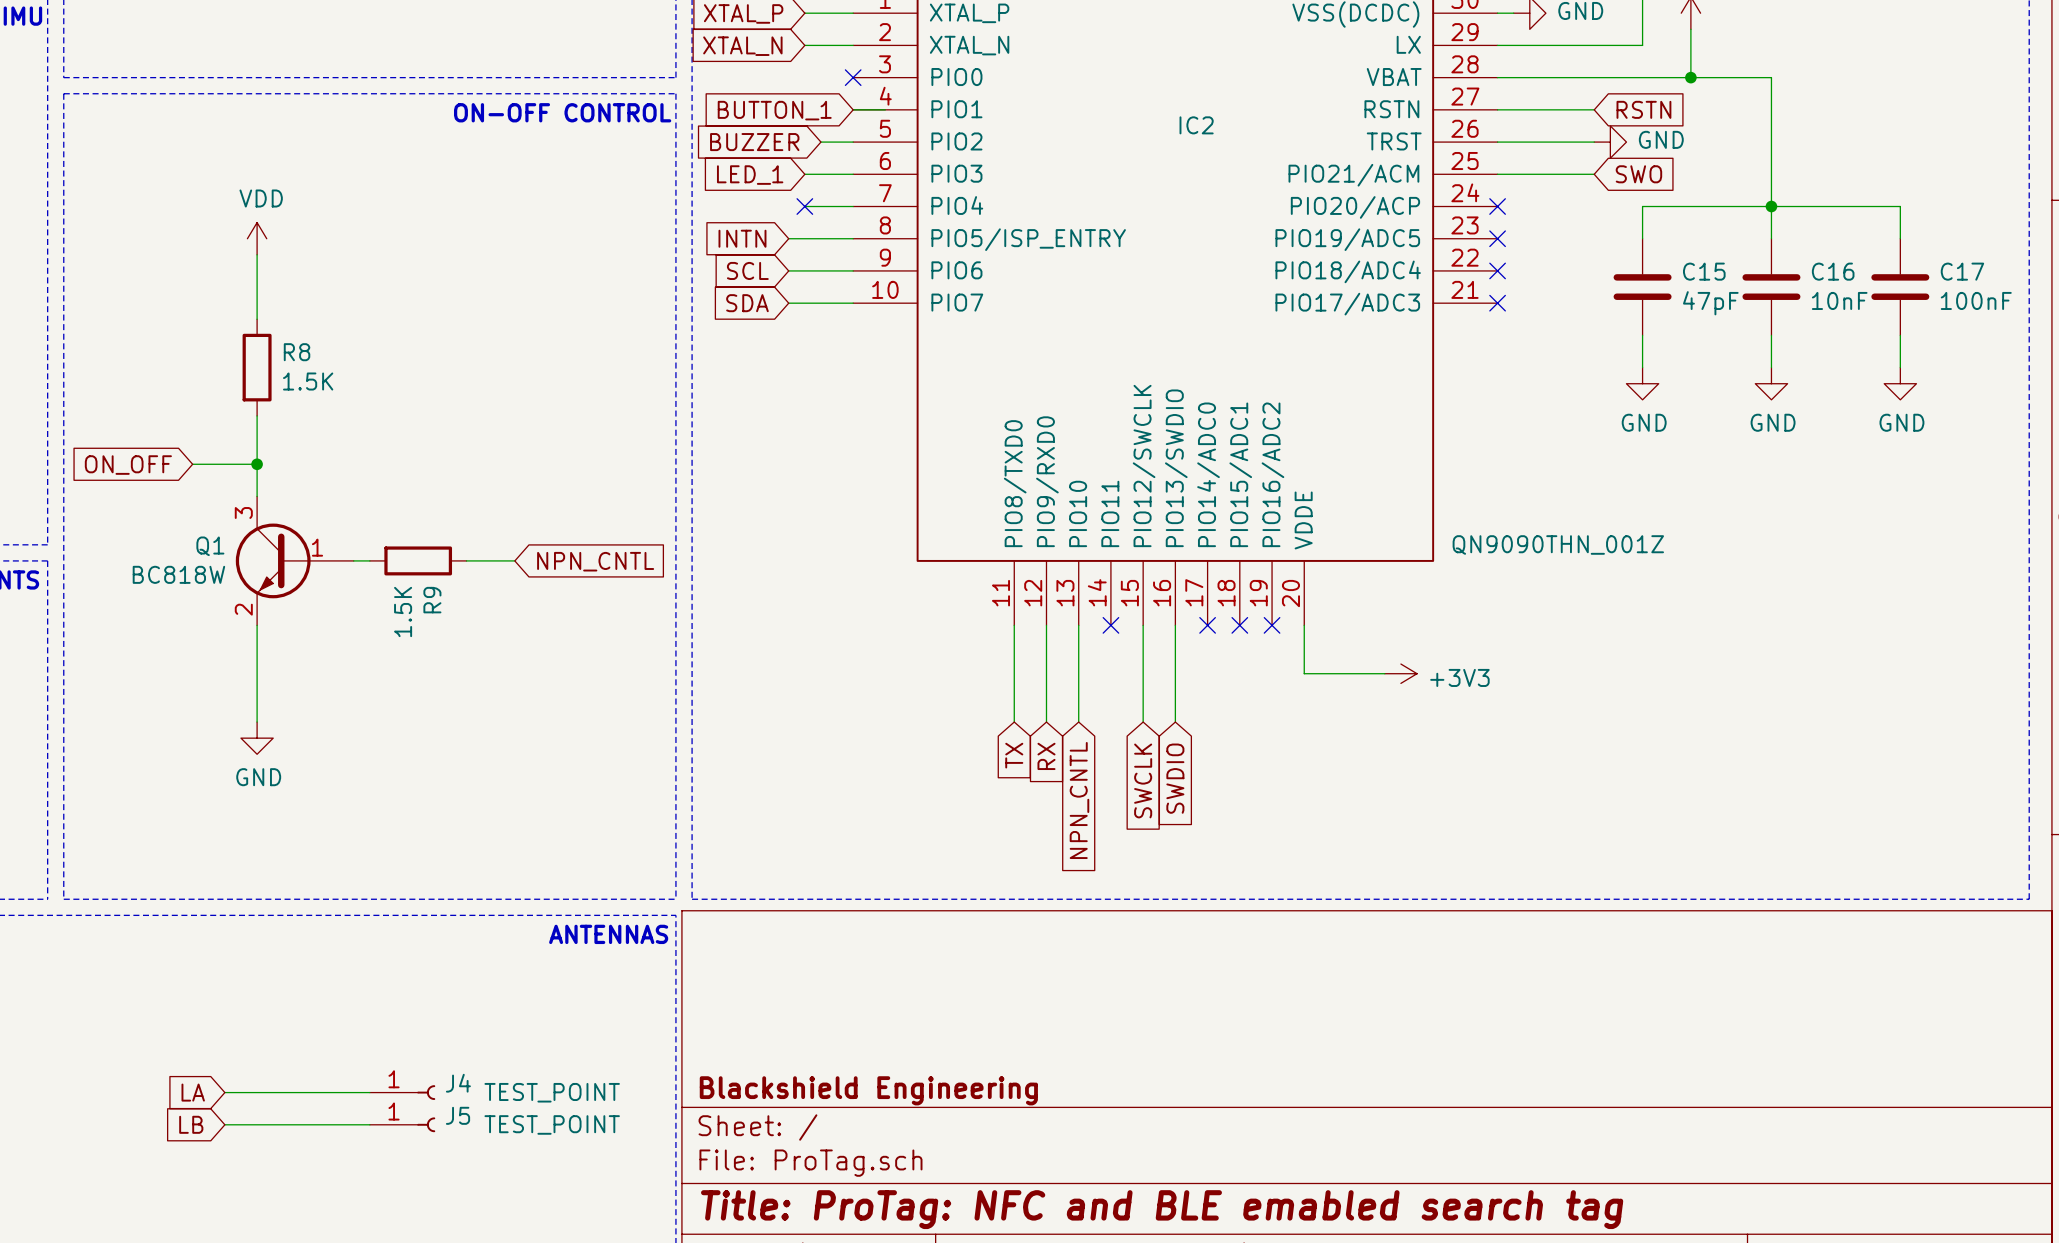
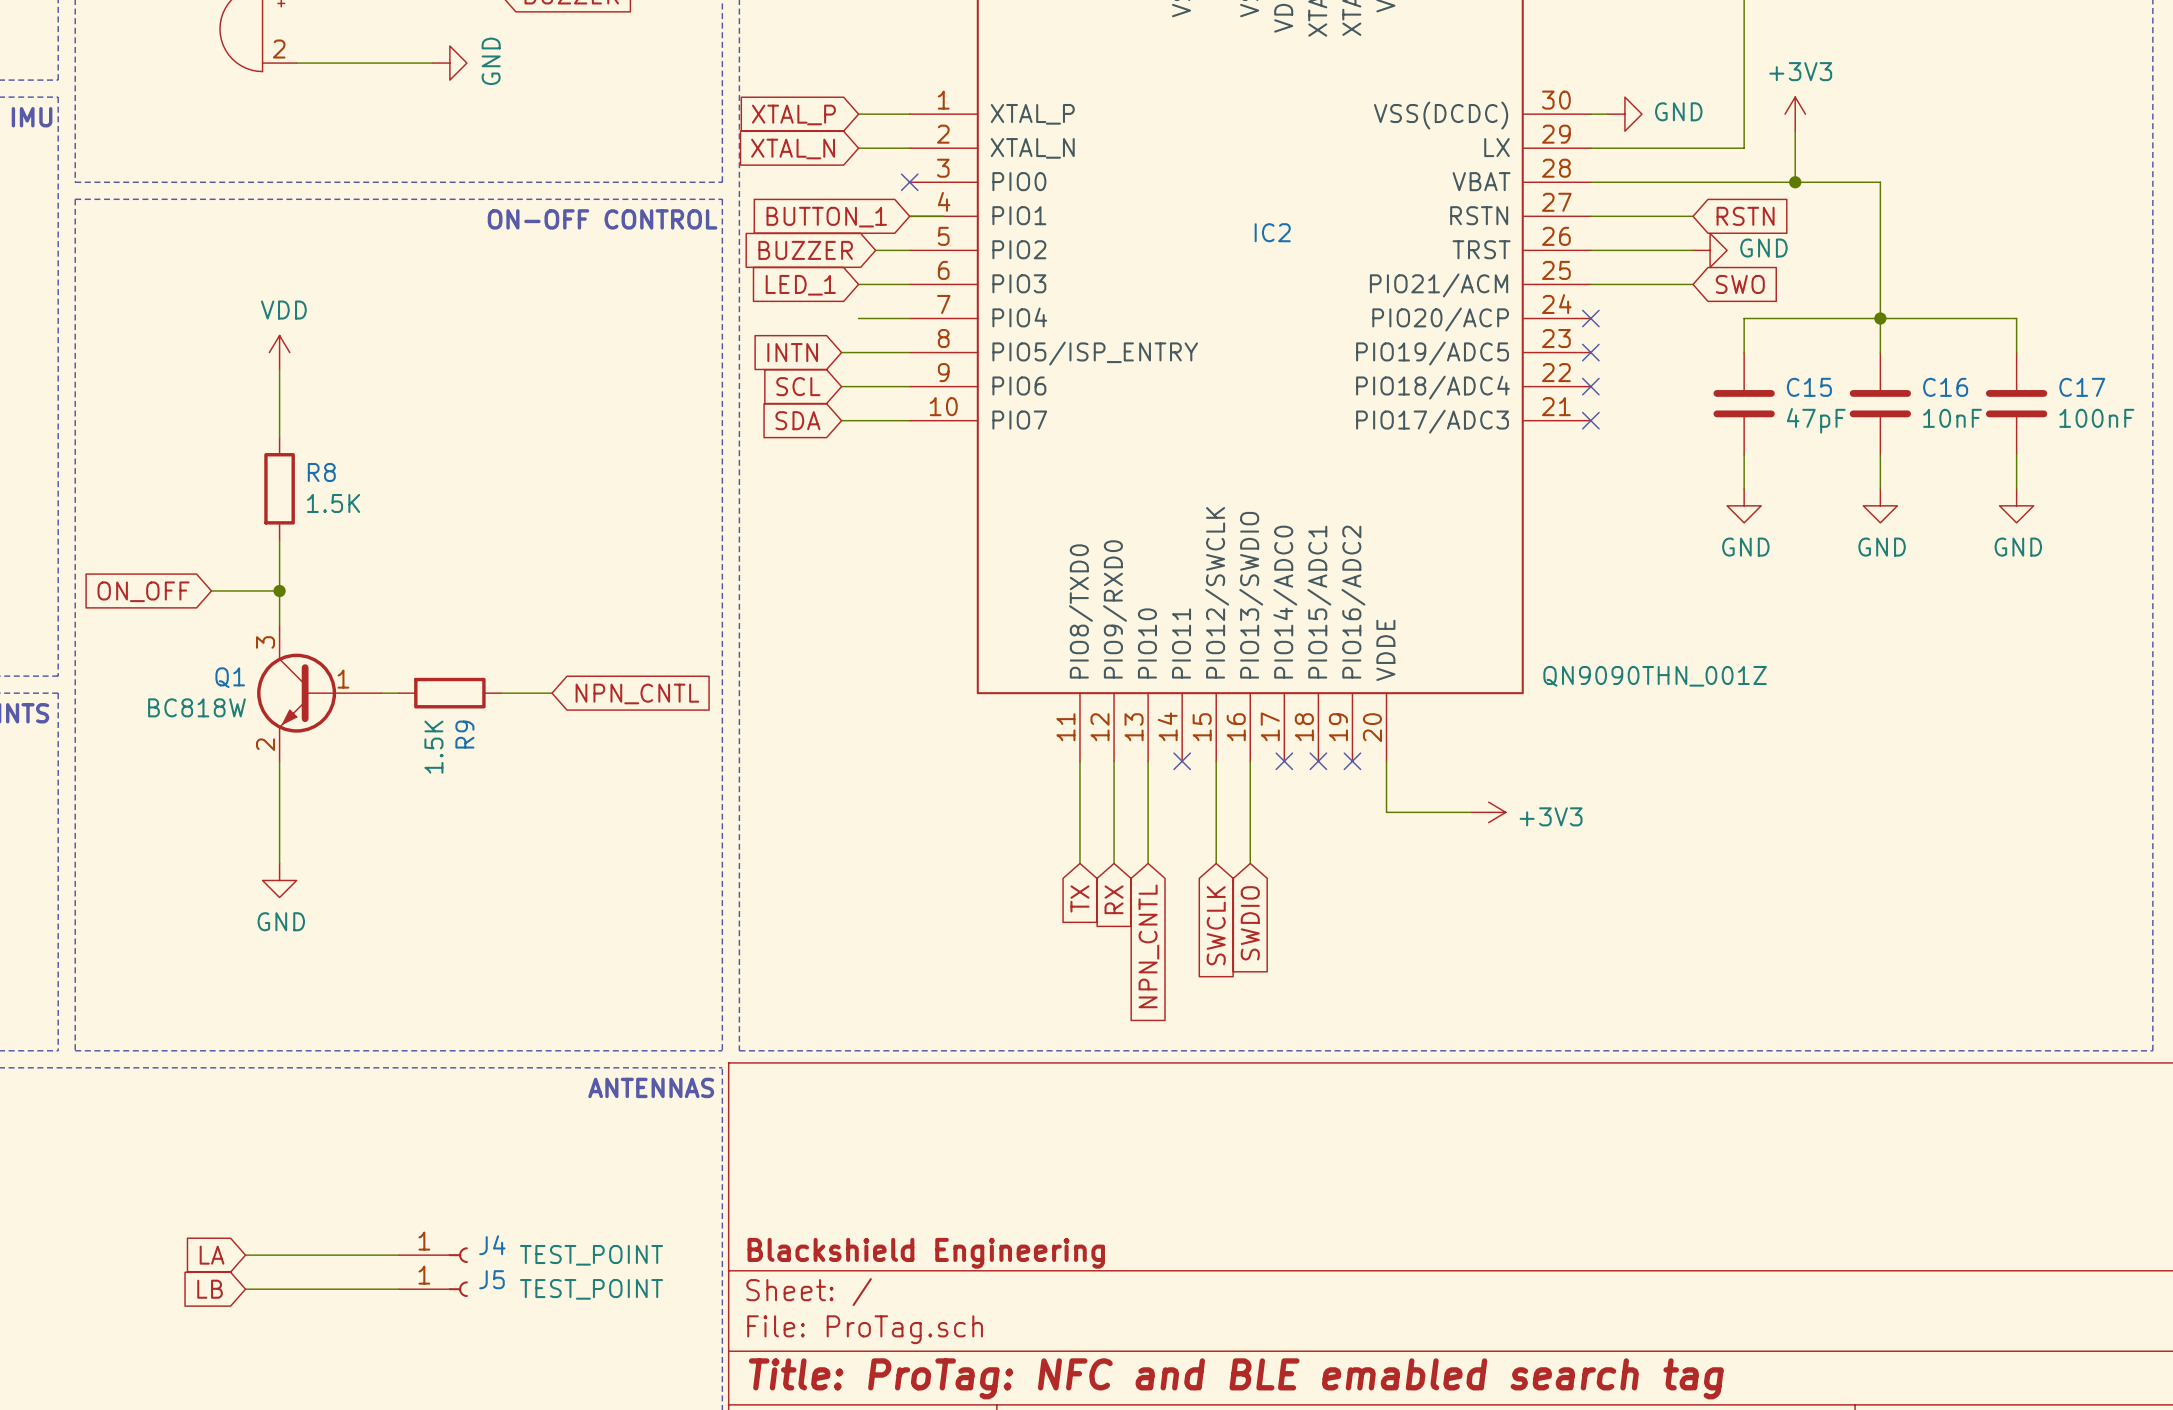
no-connect mark: (804, 206) -> none

